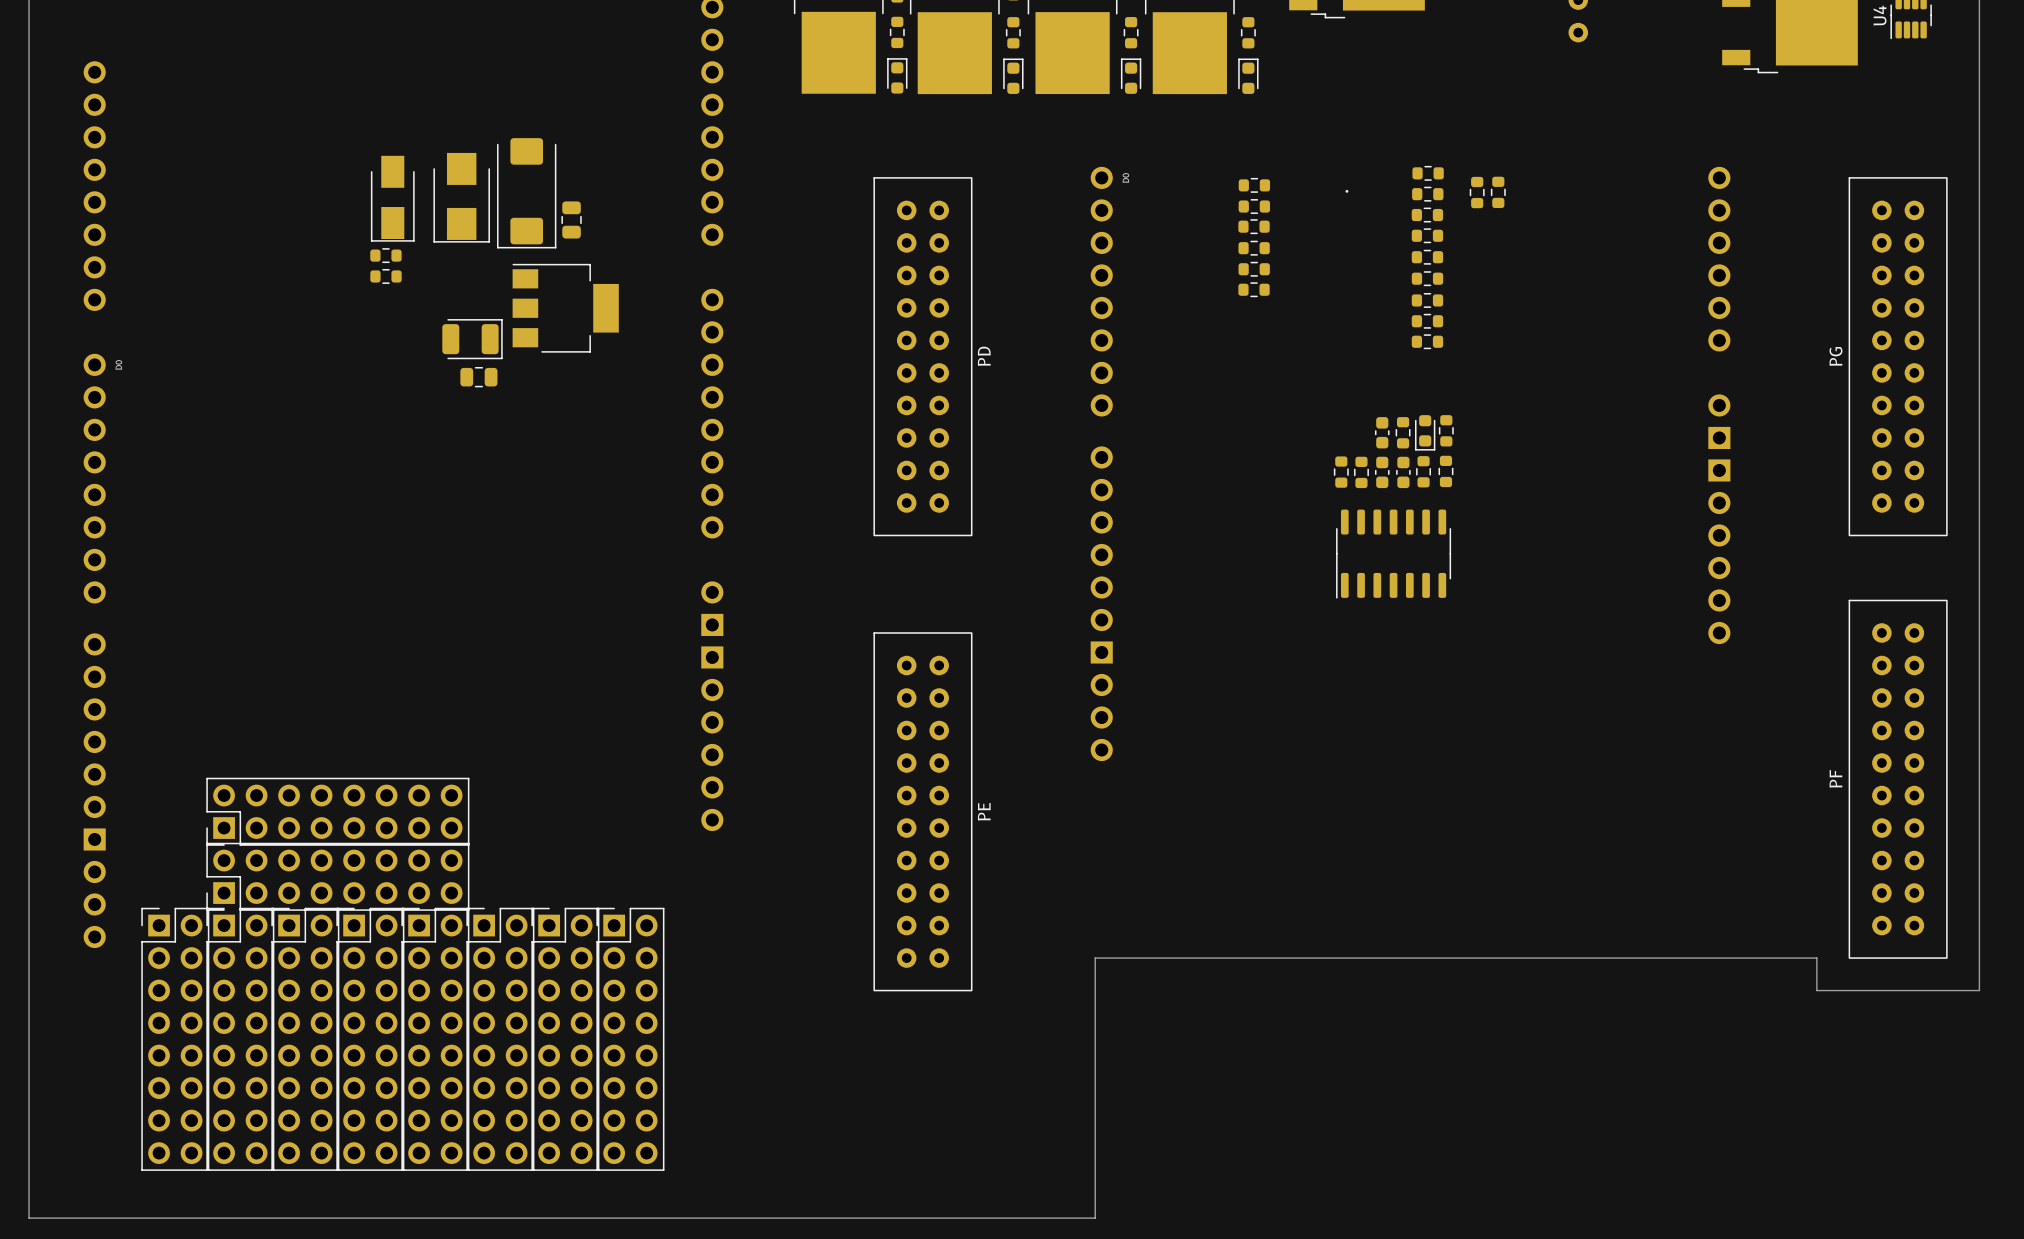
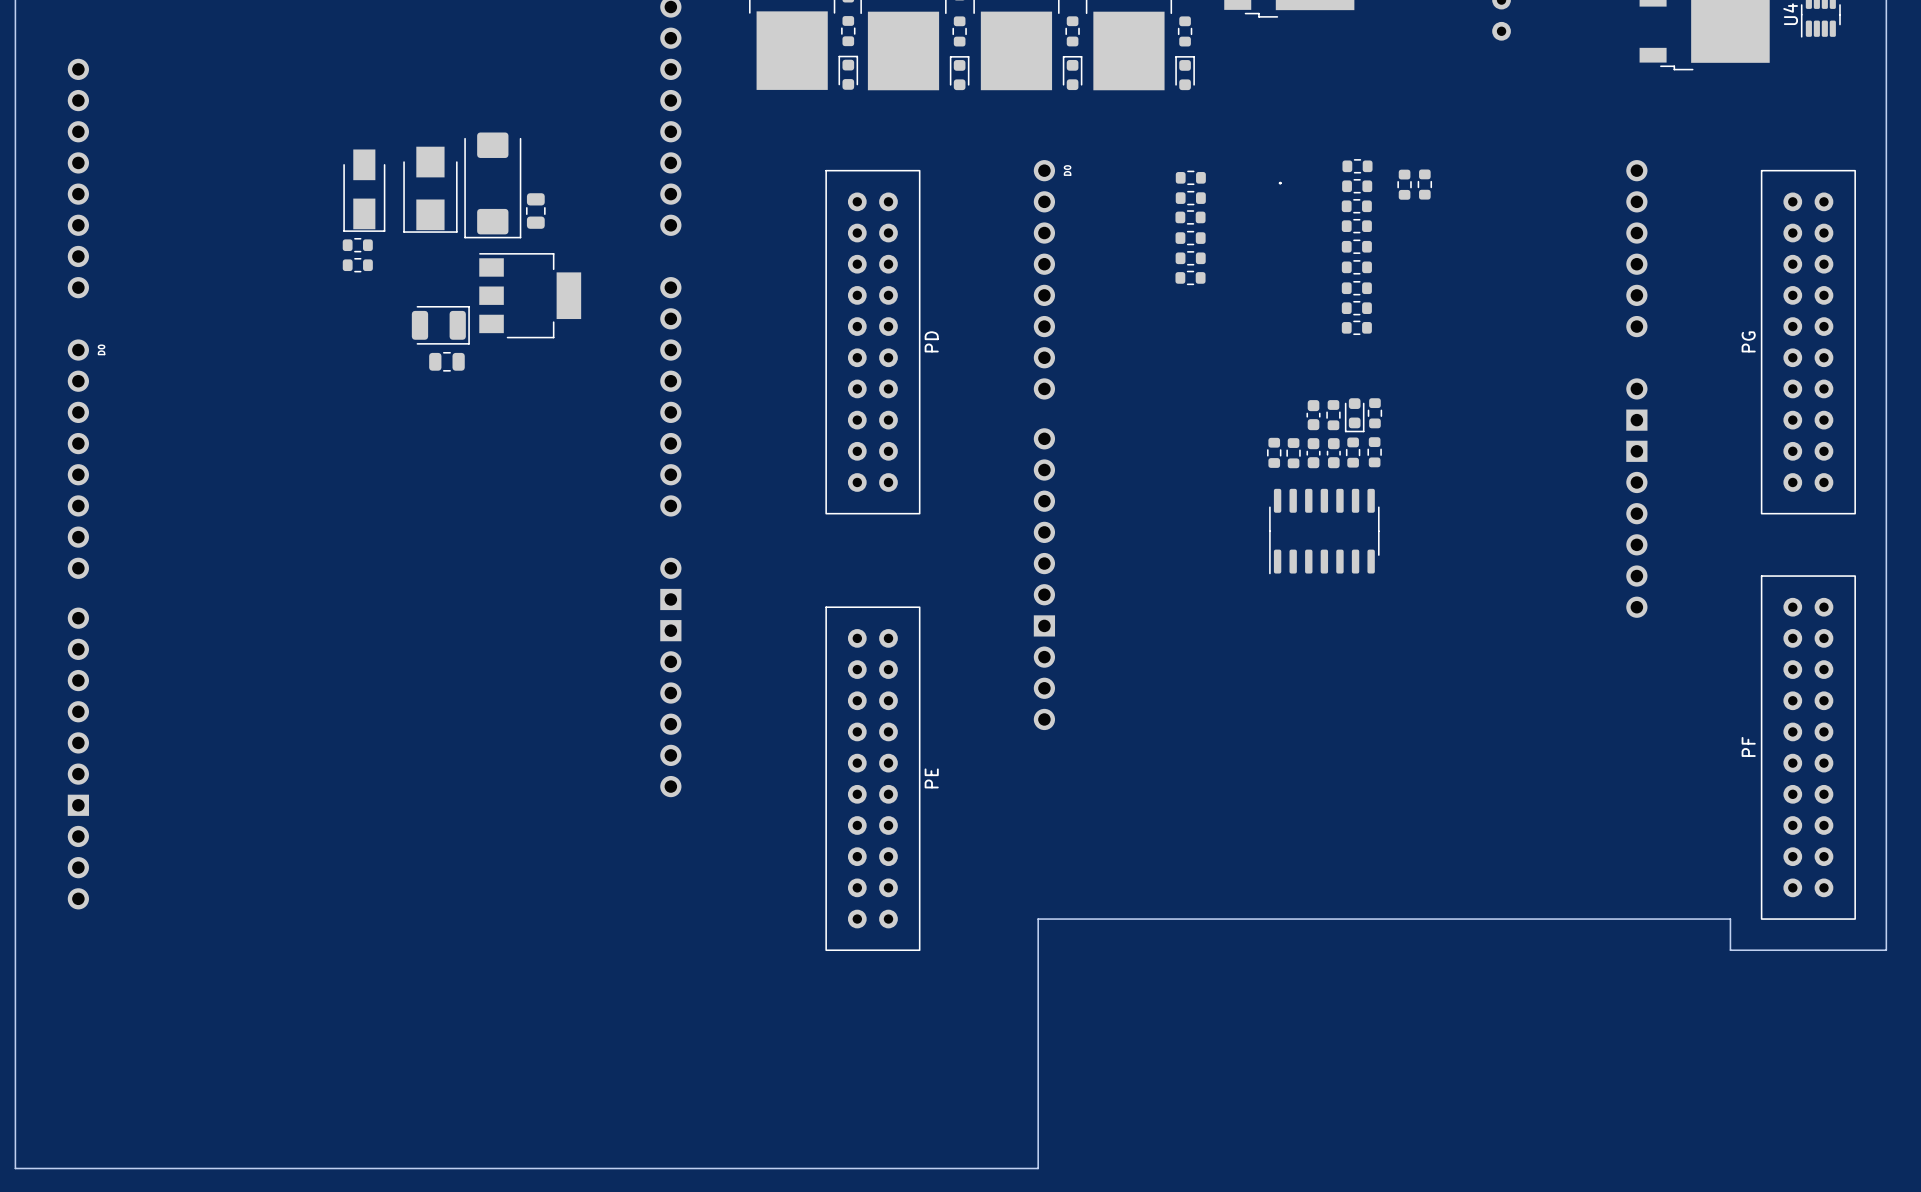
part: (337, 811) -> none
part: (337, 876) -> none
part: (175, 1039) -> none
part: (240, 1039) -> none
part: (305, 1039) -> none
part: (370, 1039) -> none
part: (435, 1039) -> none
part: (500, 1039) -> none
part: (565, 1039) -> none
part: (630, 1039) -> none

